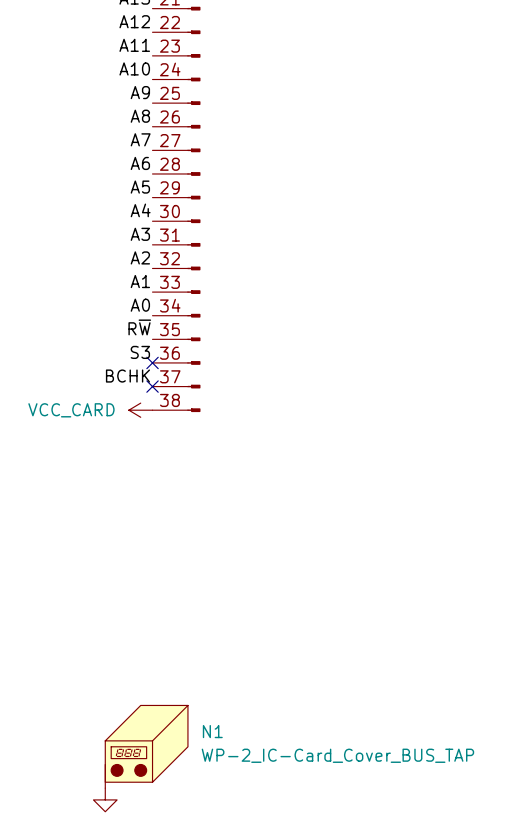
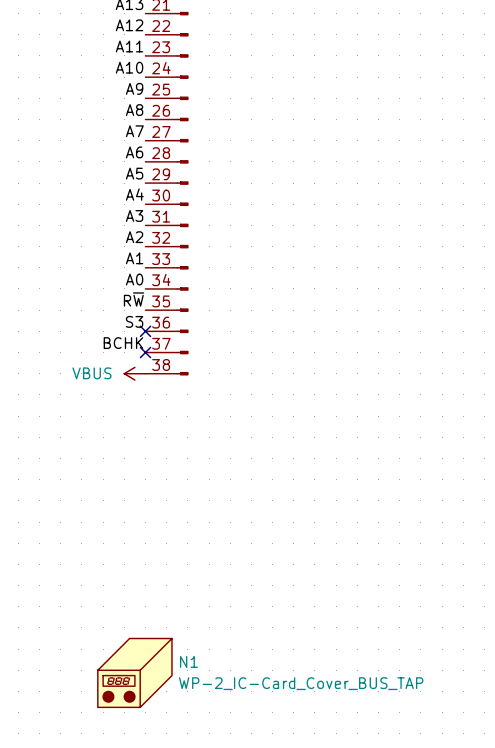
power symbol: VCC_CARD (140, 410) -> VBUS (134, 373)
N1 symbol: [105, 705, 188, 789] -> [97, 638, 172, 708]
power symbol: (105, 799) -> none

